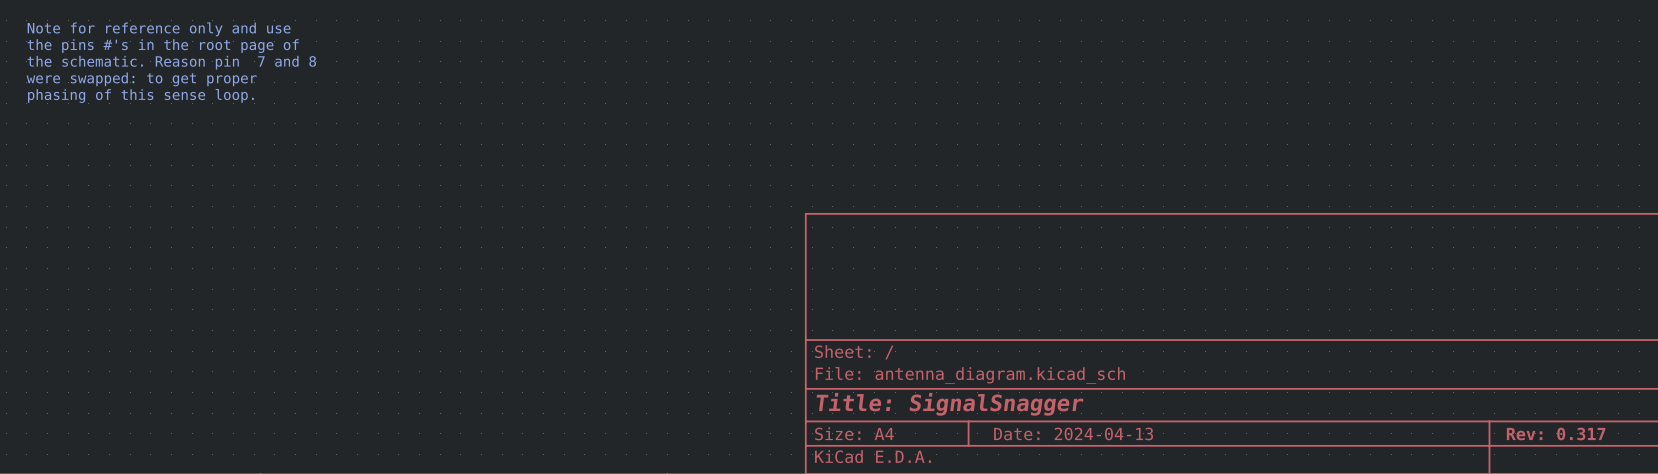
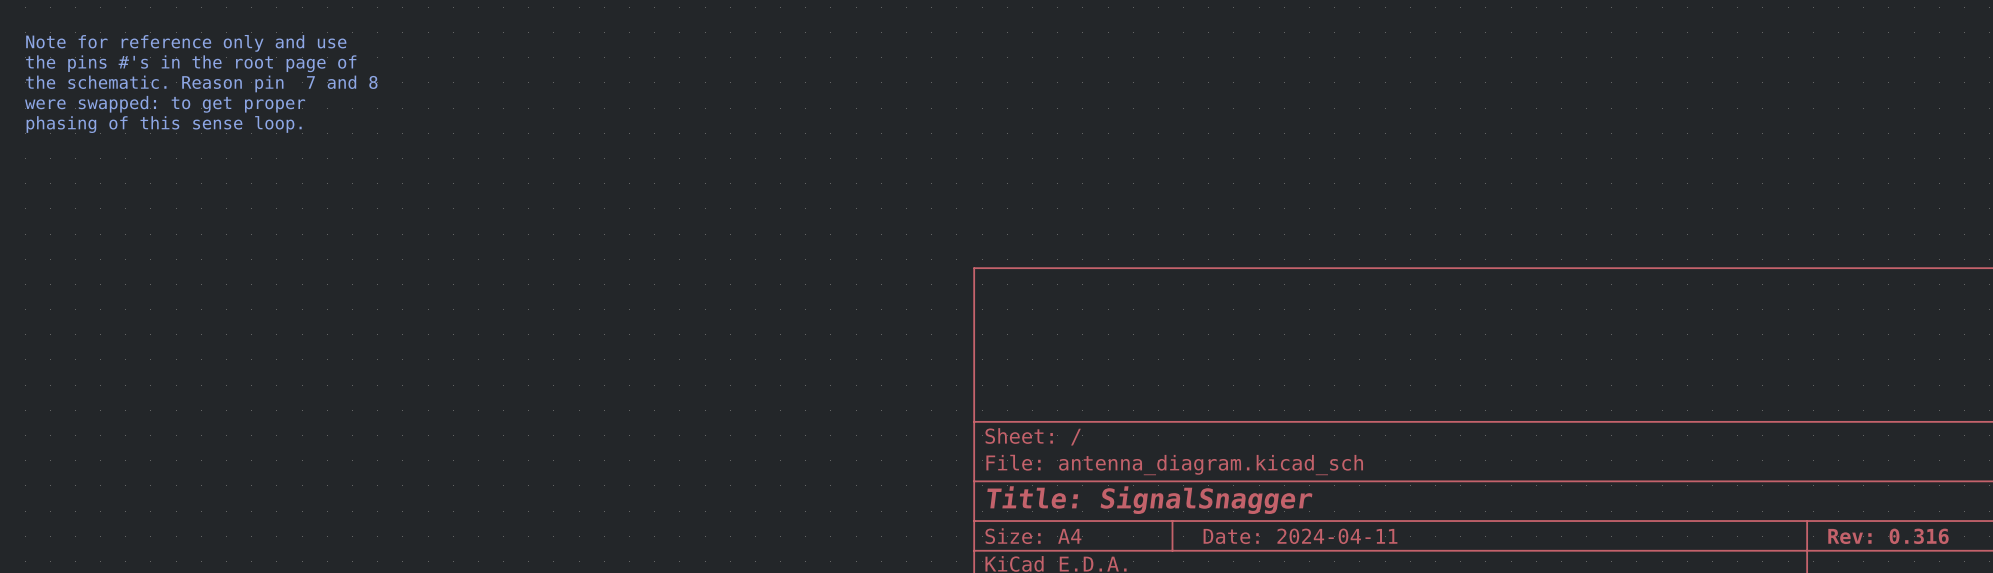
title block: Date: 2024-04-13 (1073, 433) -> Date: 2024-04-11 (1300, 536)
title block: Rev: 0.317 (1556, 433) -> Rev: 0.316 (1888, 536)

